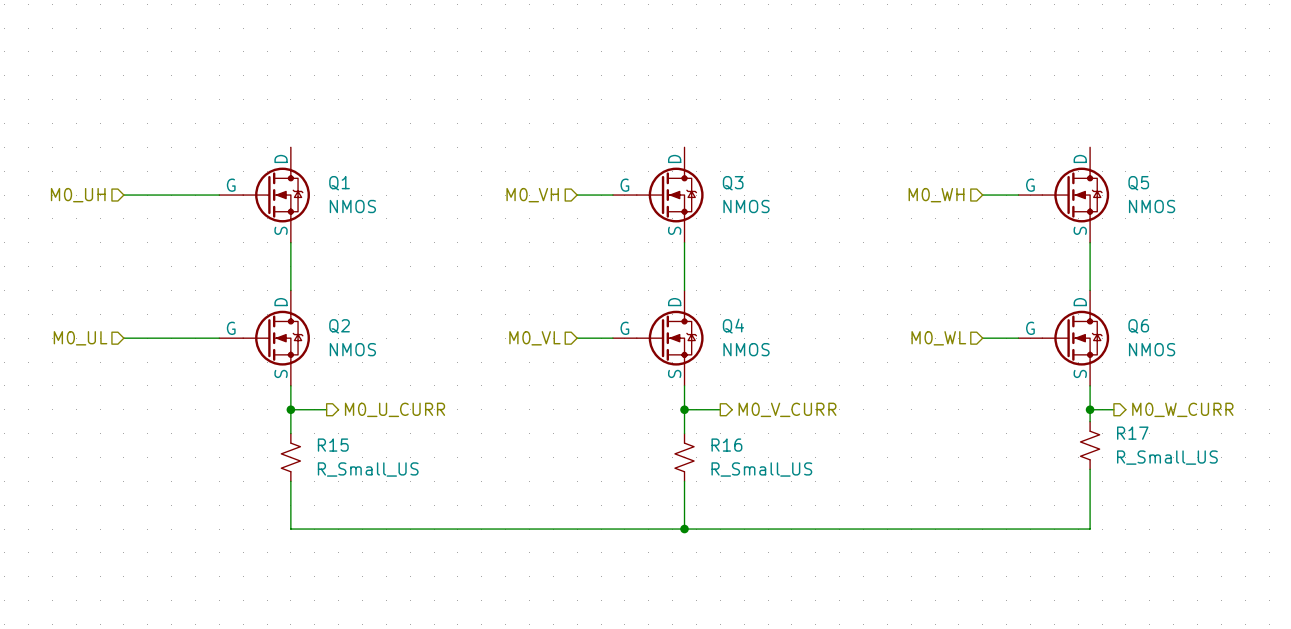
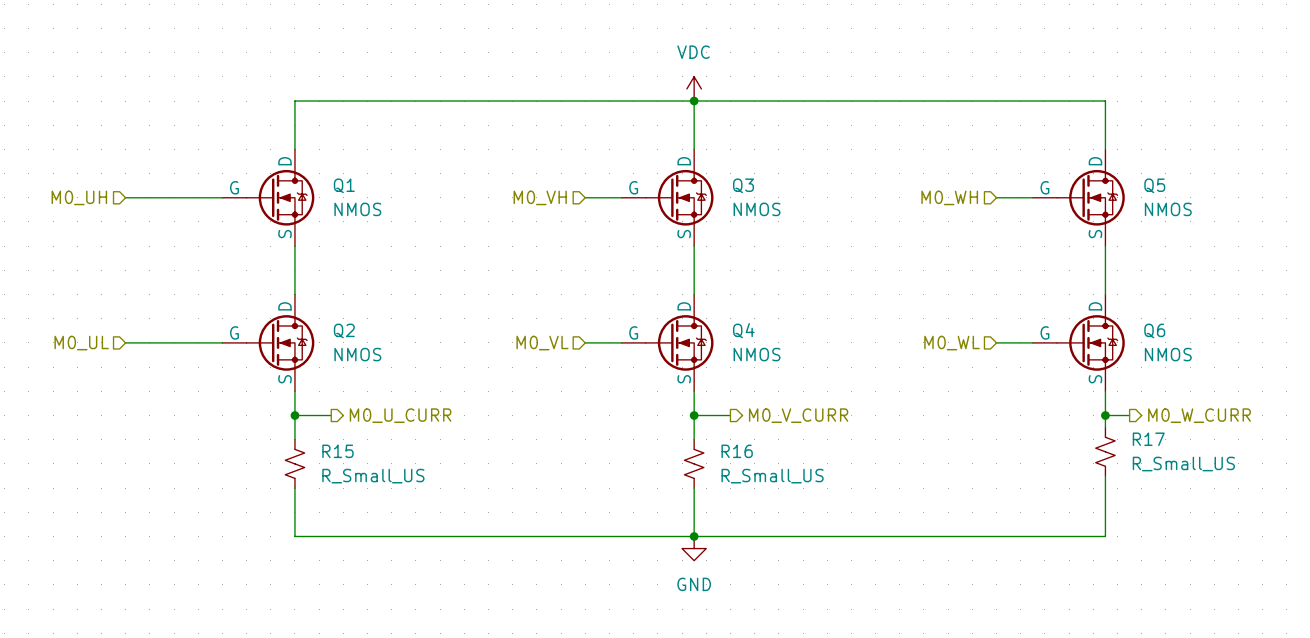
power symbol: none -> VDC (694, 88)
wire: none -> (694, 101) (694, 149)
junction: none -> (694, 101)
wire: none -> (294, 149) (294, 101) (1105, 101) (1105, 149)
power symbol: none -> GND (694, 548)

